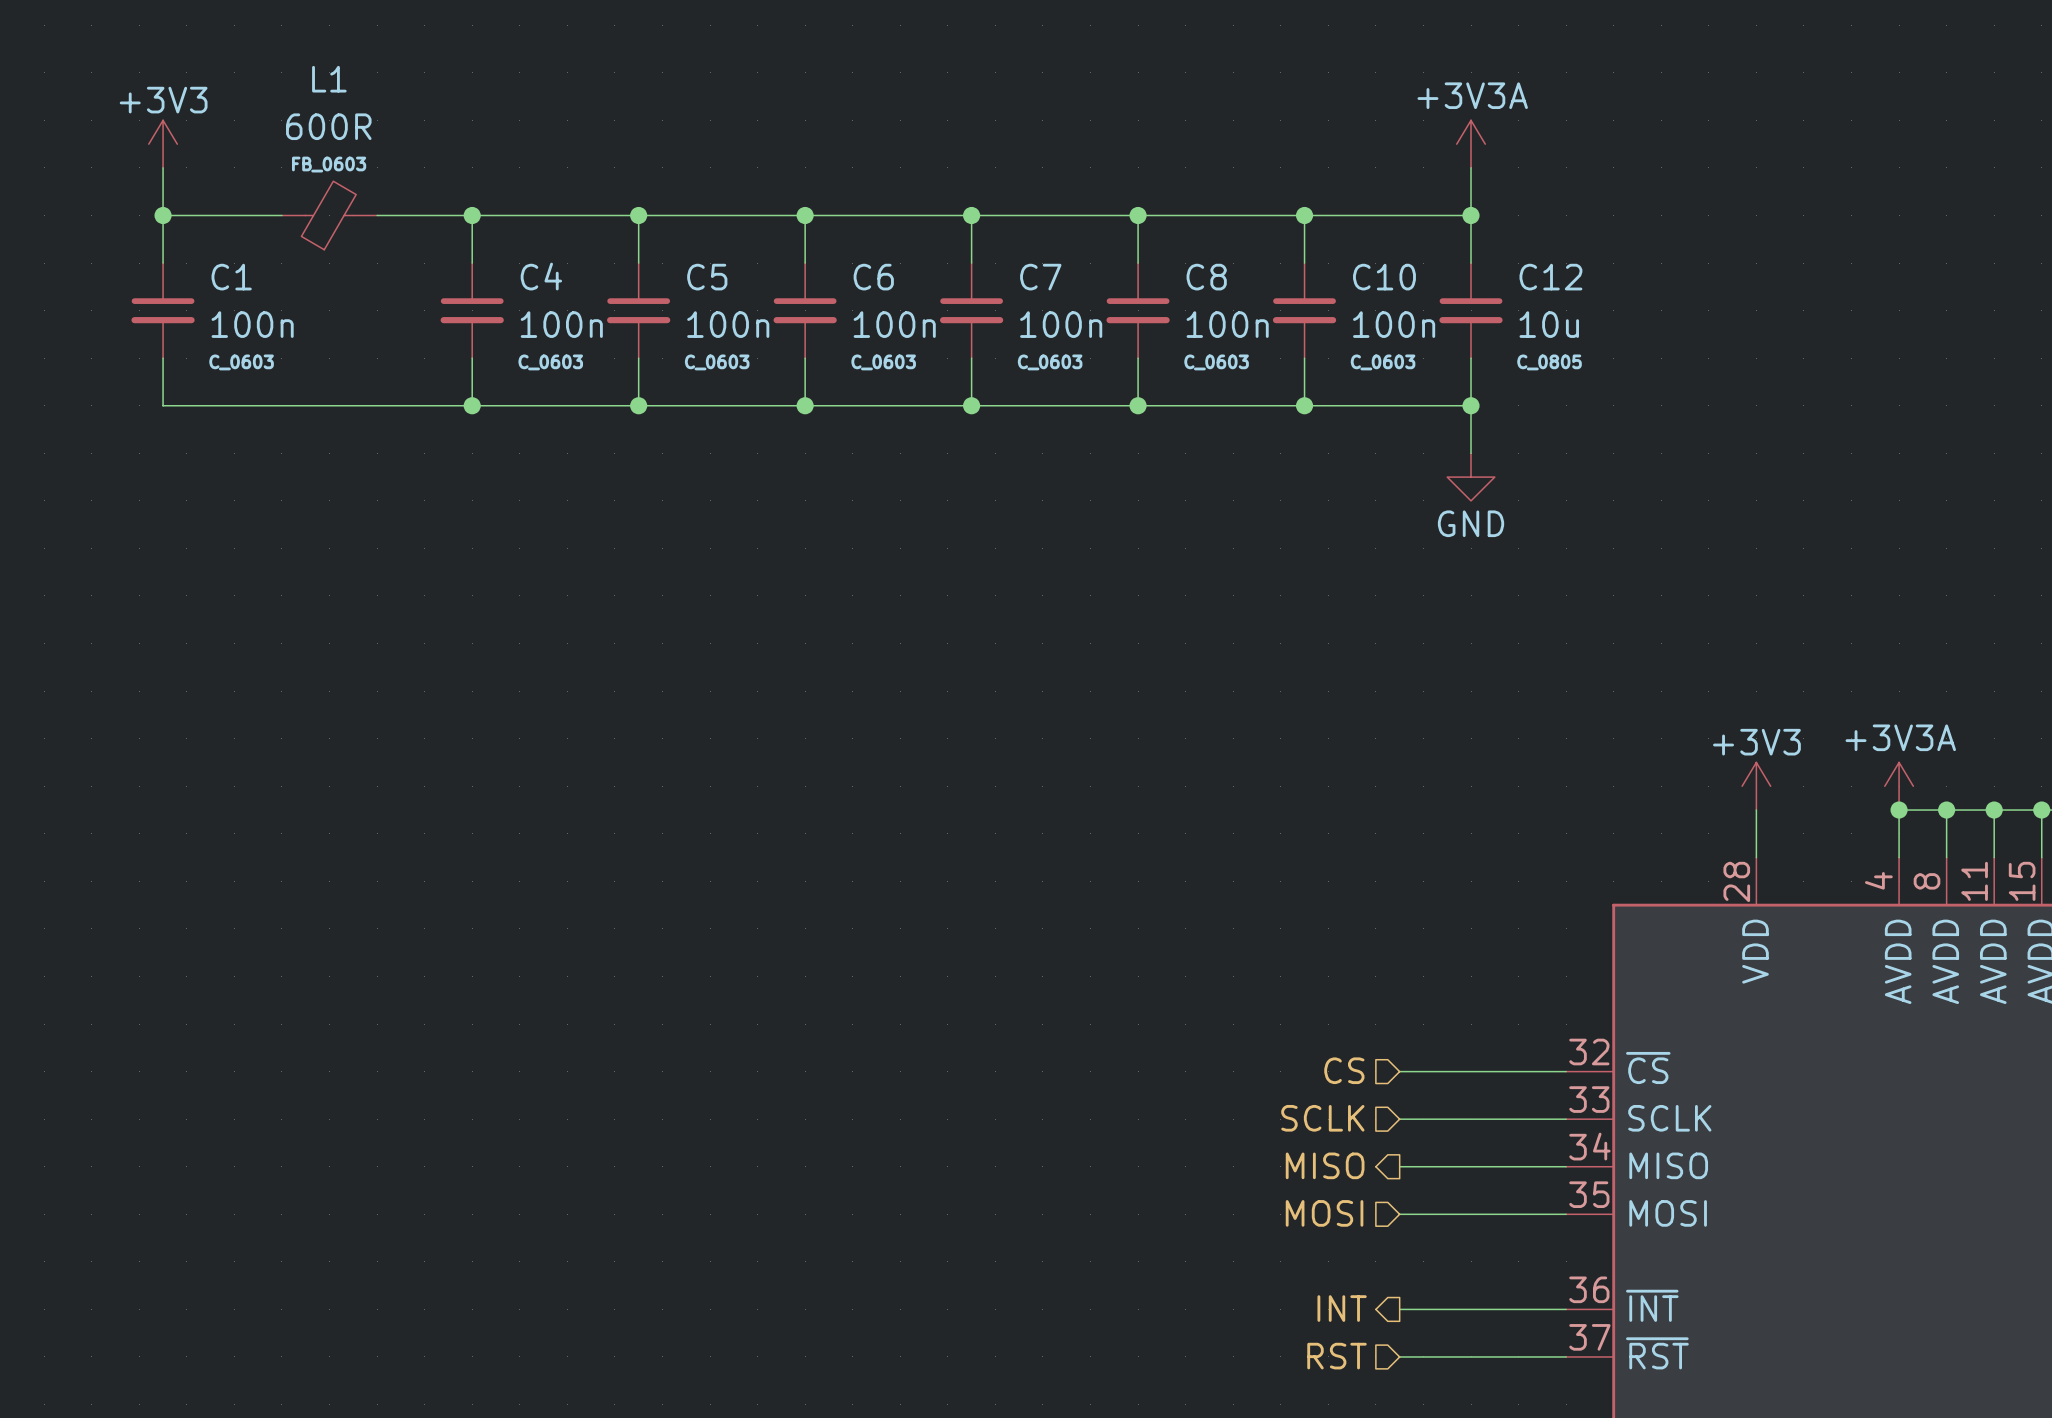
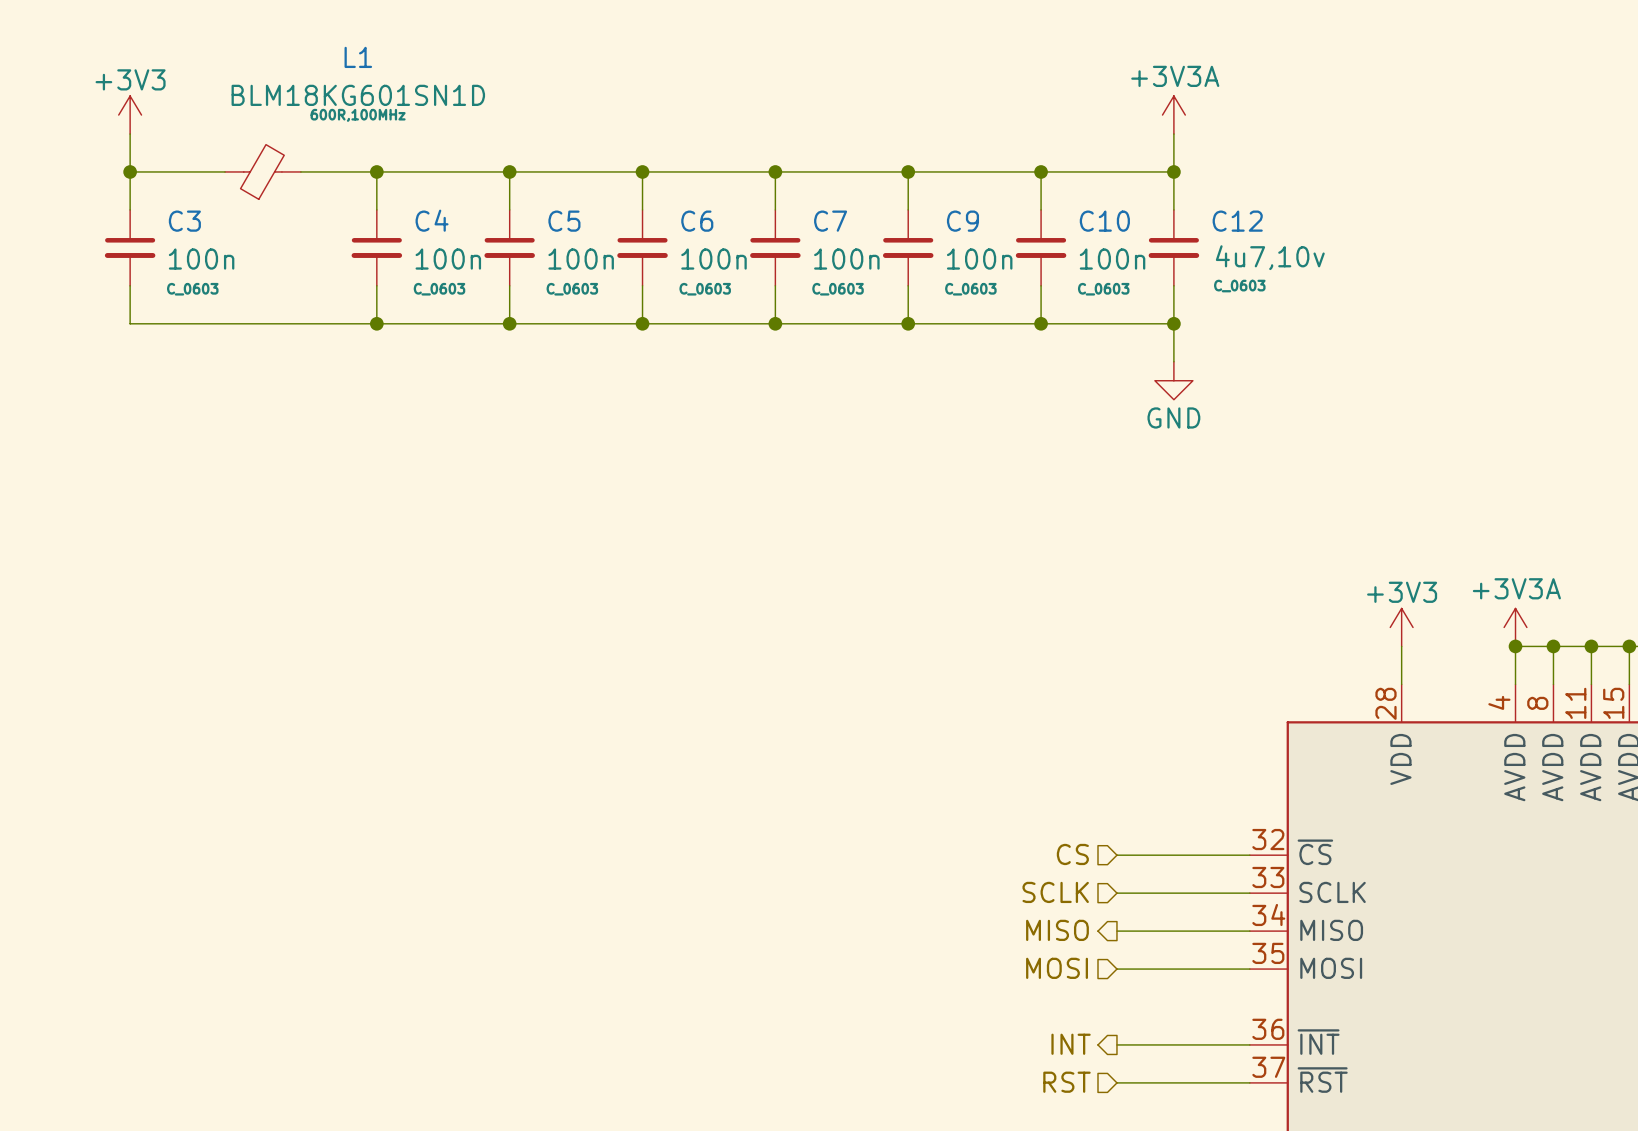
L1 name position: L1 (329, 79) -> L1 (358, 57)
L1 value: 600R (328, 126) -> BLM18KG601SN1D (358, 95)
L1 text: none -> 600R,100MHz (358, 115)
L1 text: FB_0603 (329, 164) -> none
C1 name: C1 (231, 277) -> C3 (184, 221)
C8 name: C8 (1206, 277) -> C9 (962, 221)
C12 value: 10u (1549, 324) -> 4u7,10v (1270, 257)
C12 text: C_0805 (1549, 362) -> C_0603 (1239, 286)

